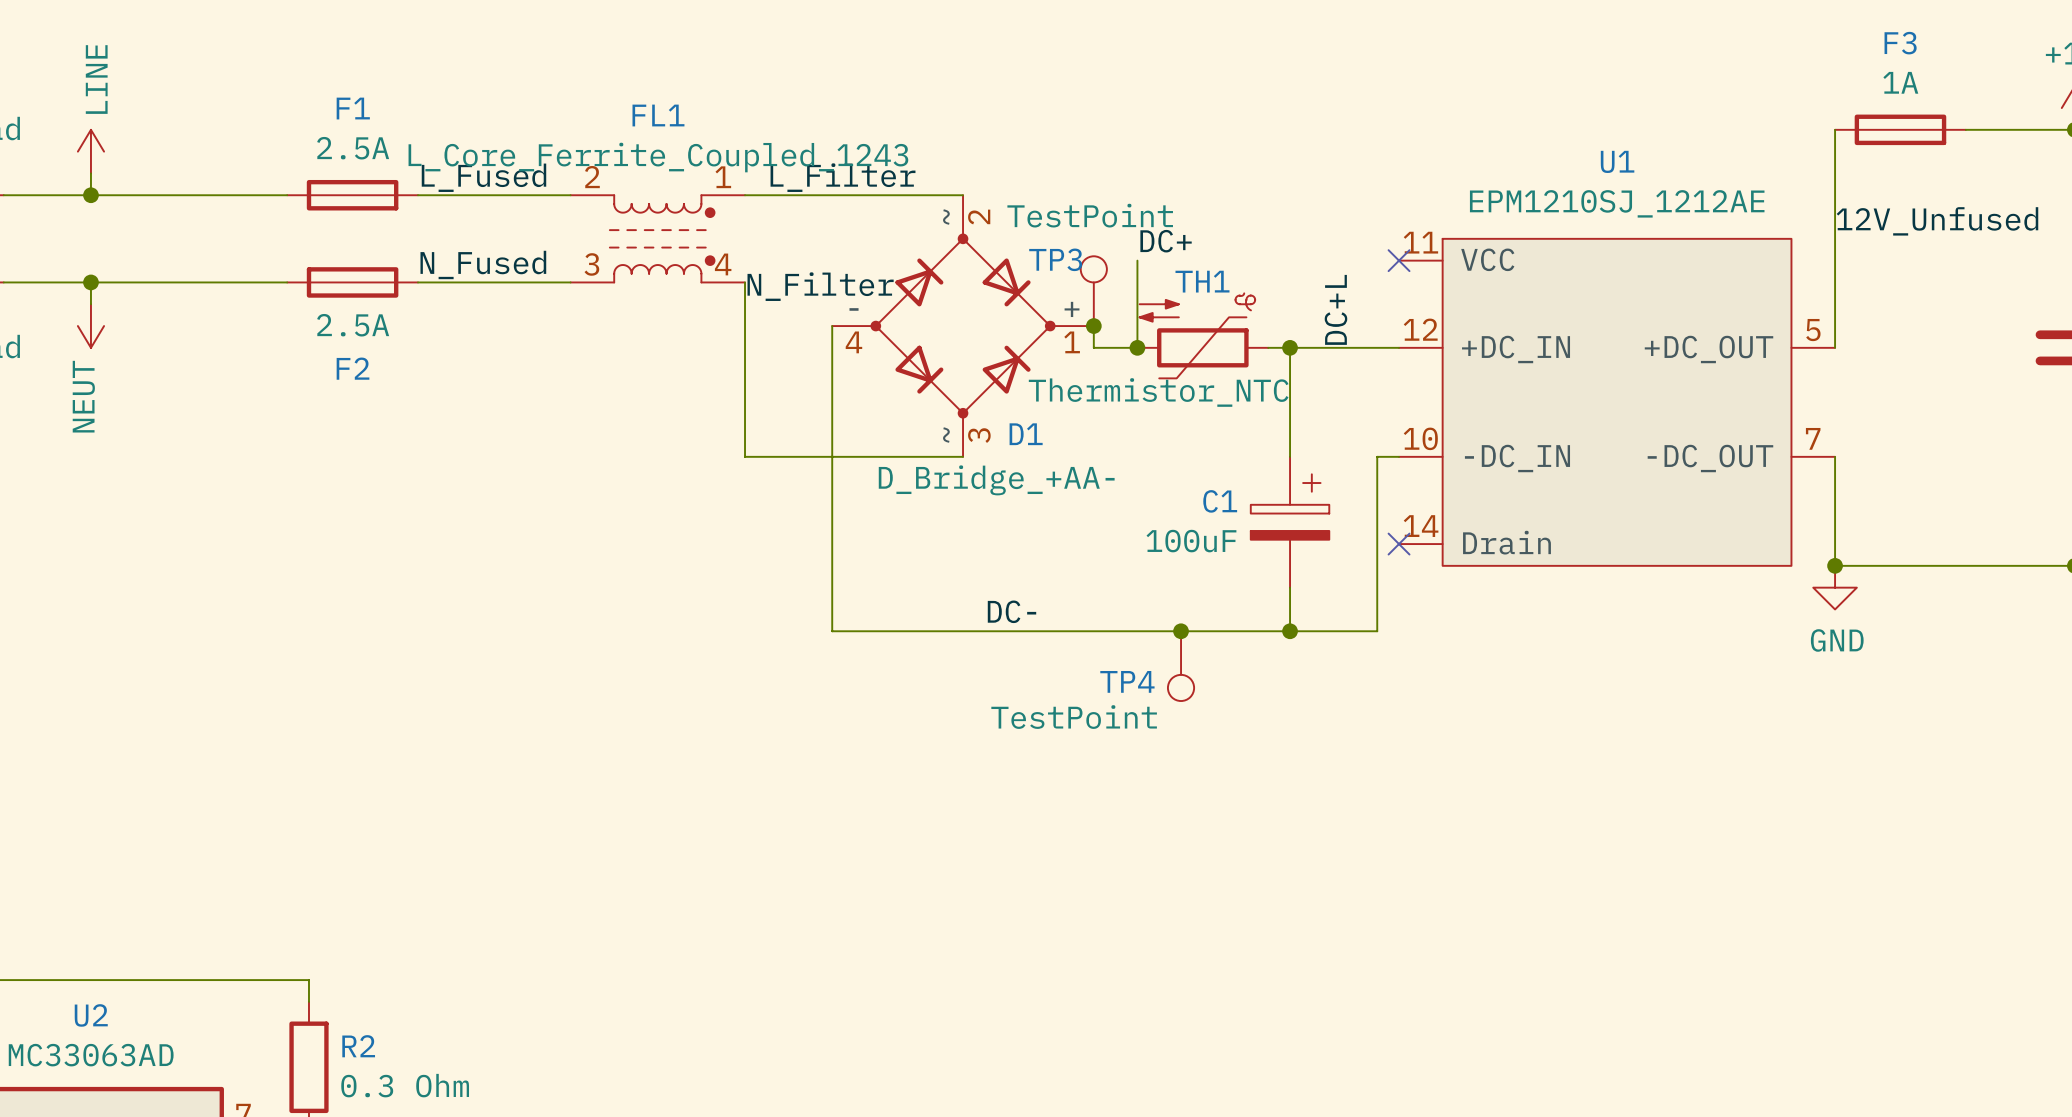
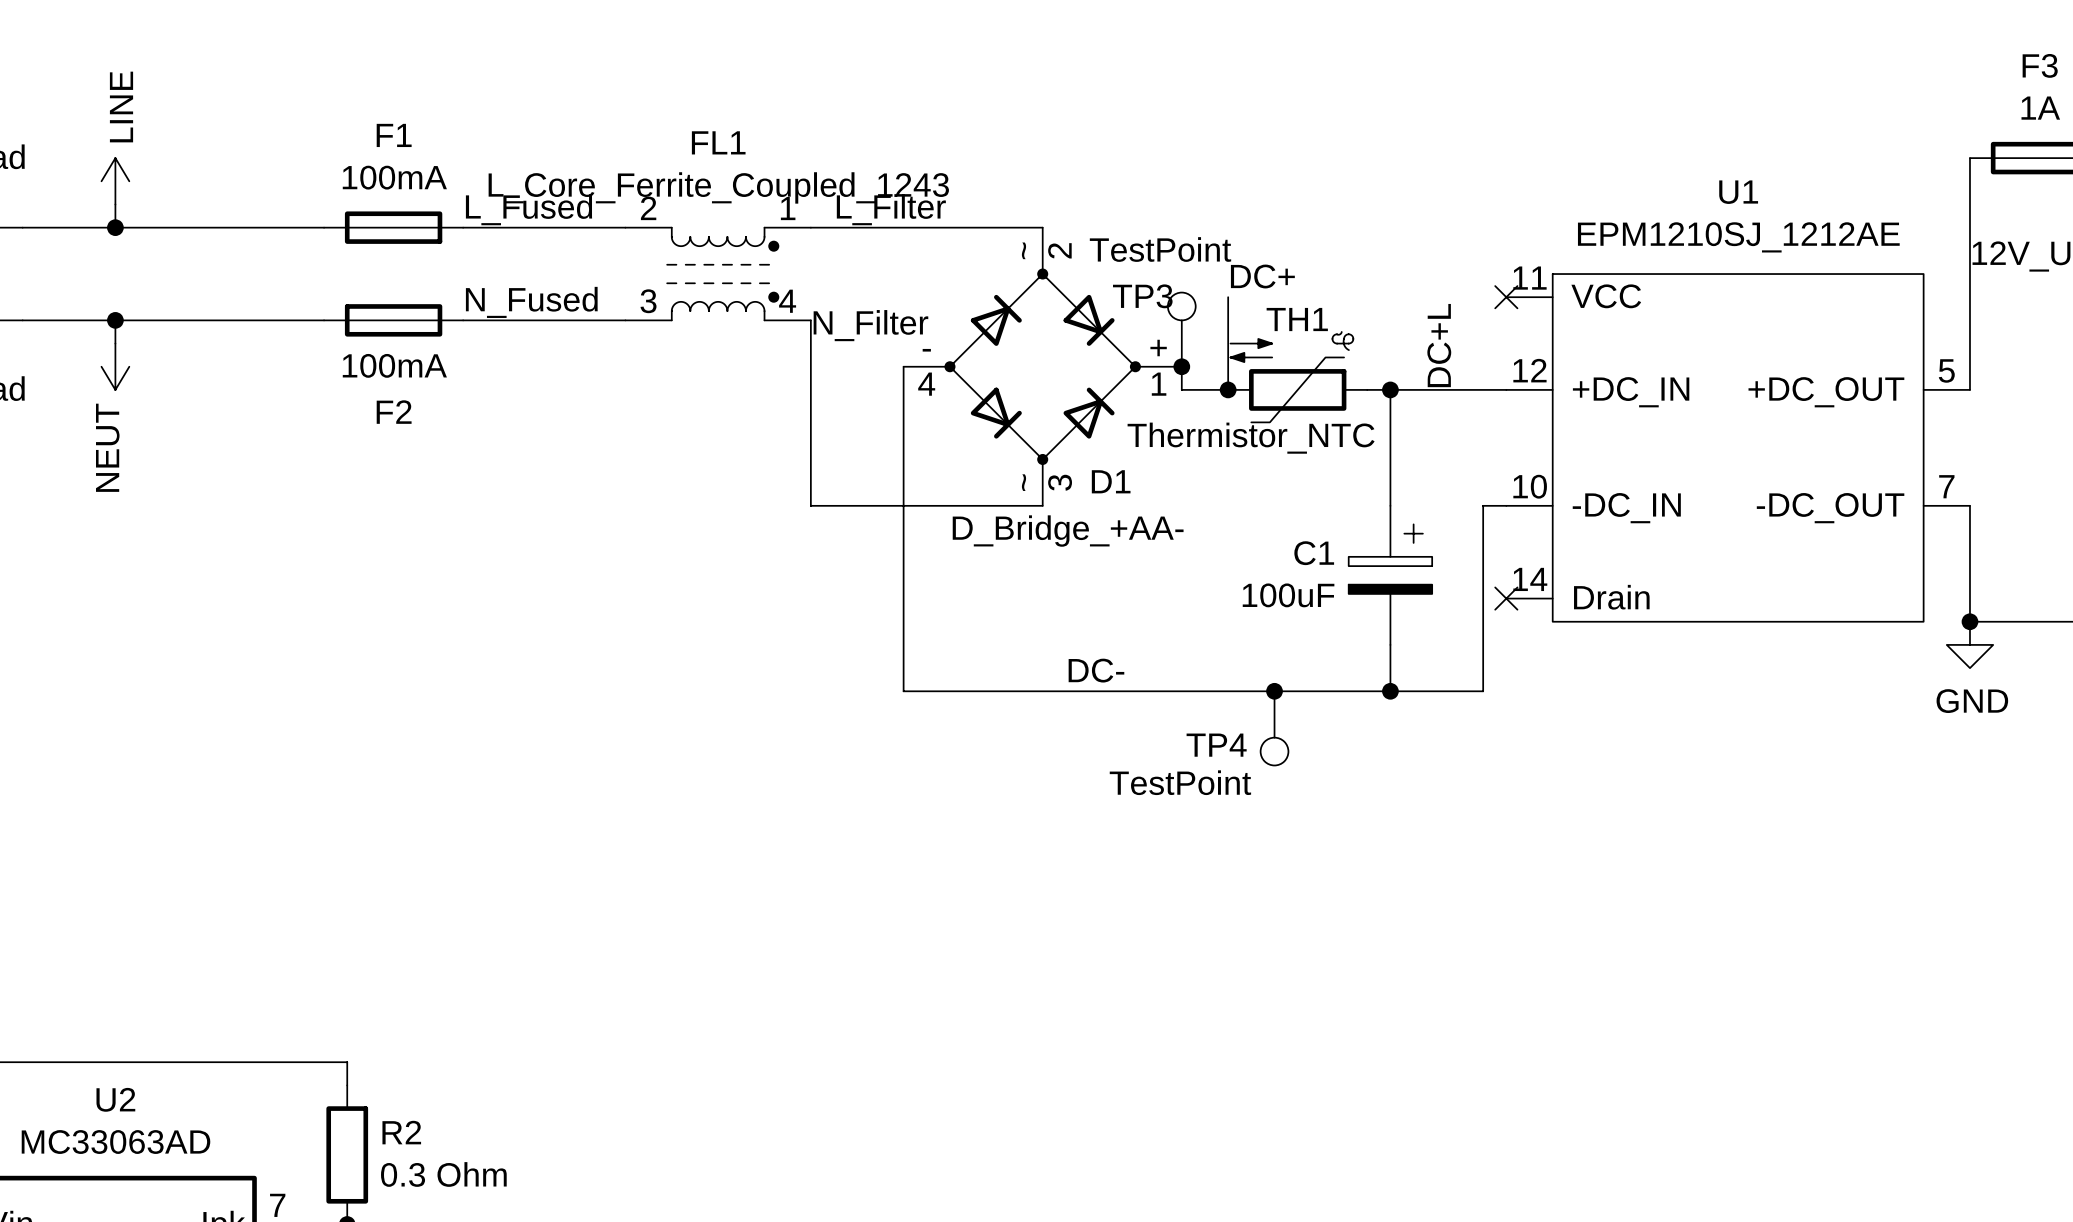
F1 value: 2.5A (353, 148) -> 100mA (394, 177)
F2 value: 2.5A (353, 325) -> 100mA (394, 365)

